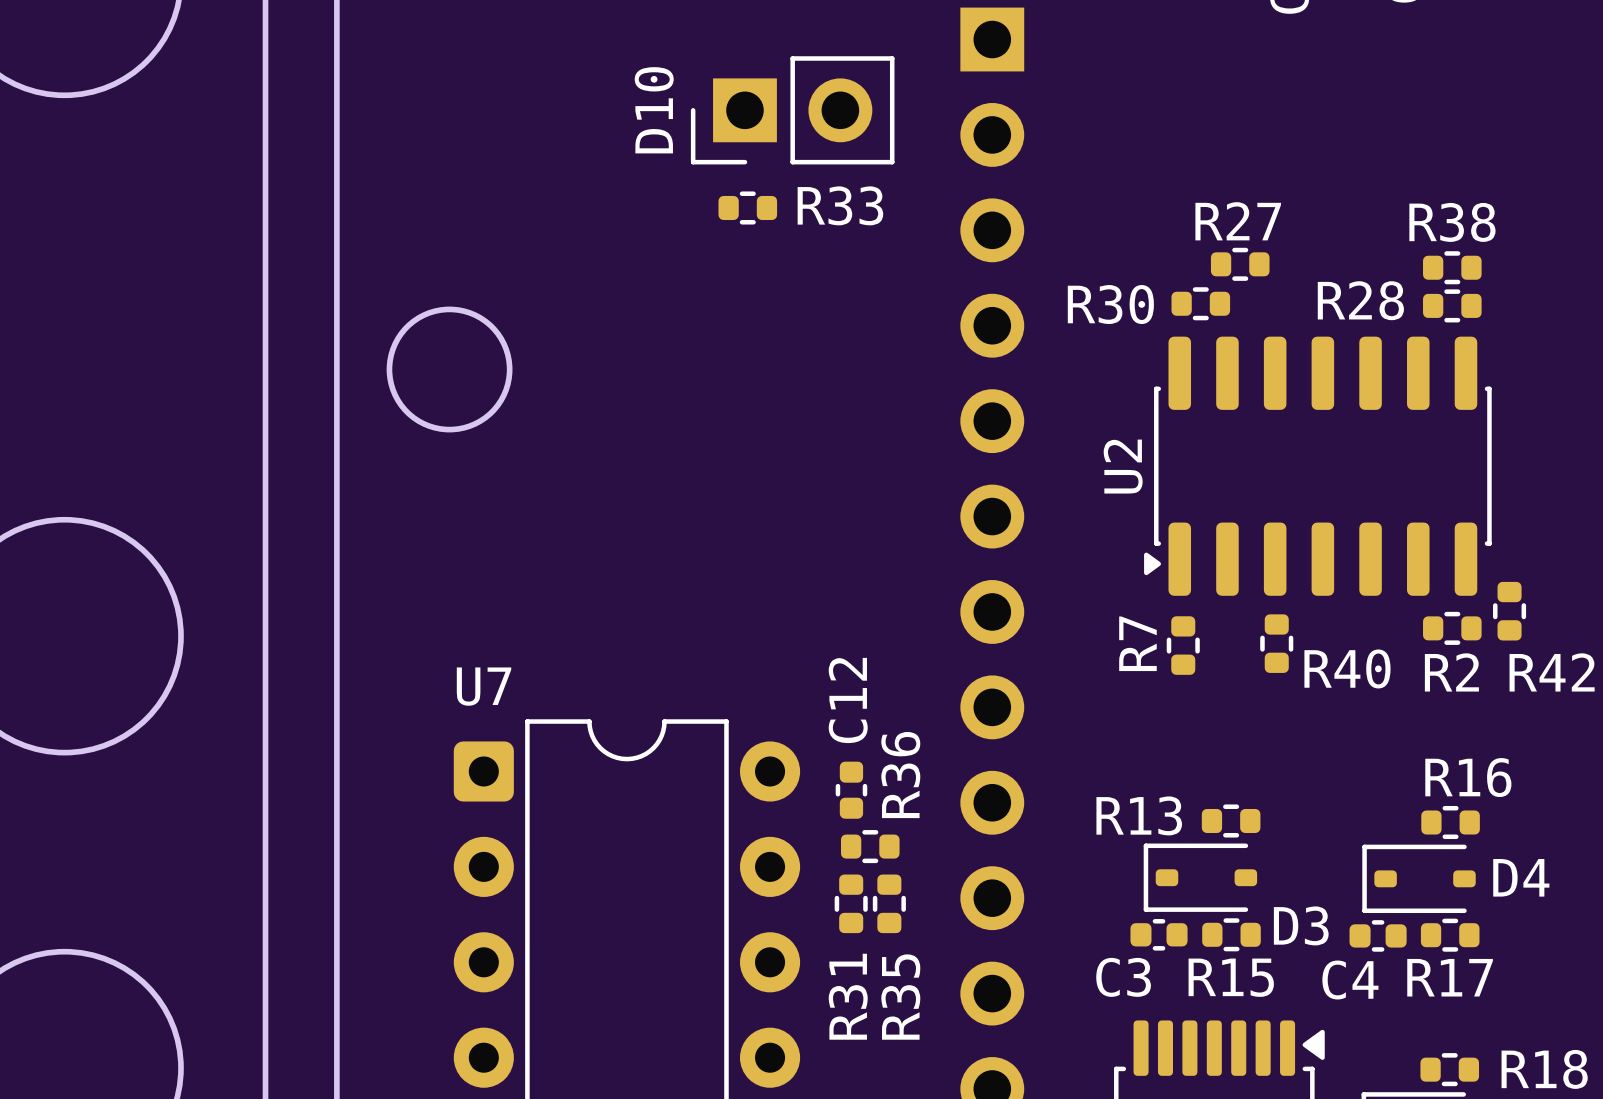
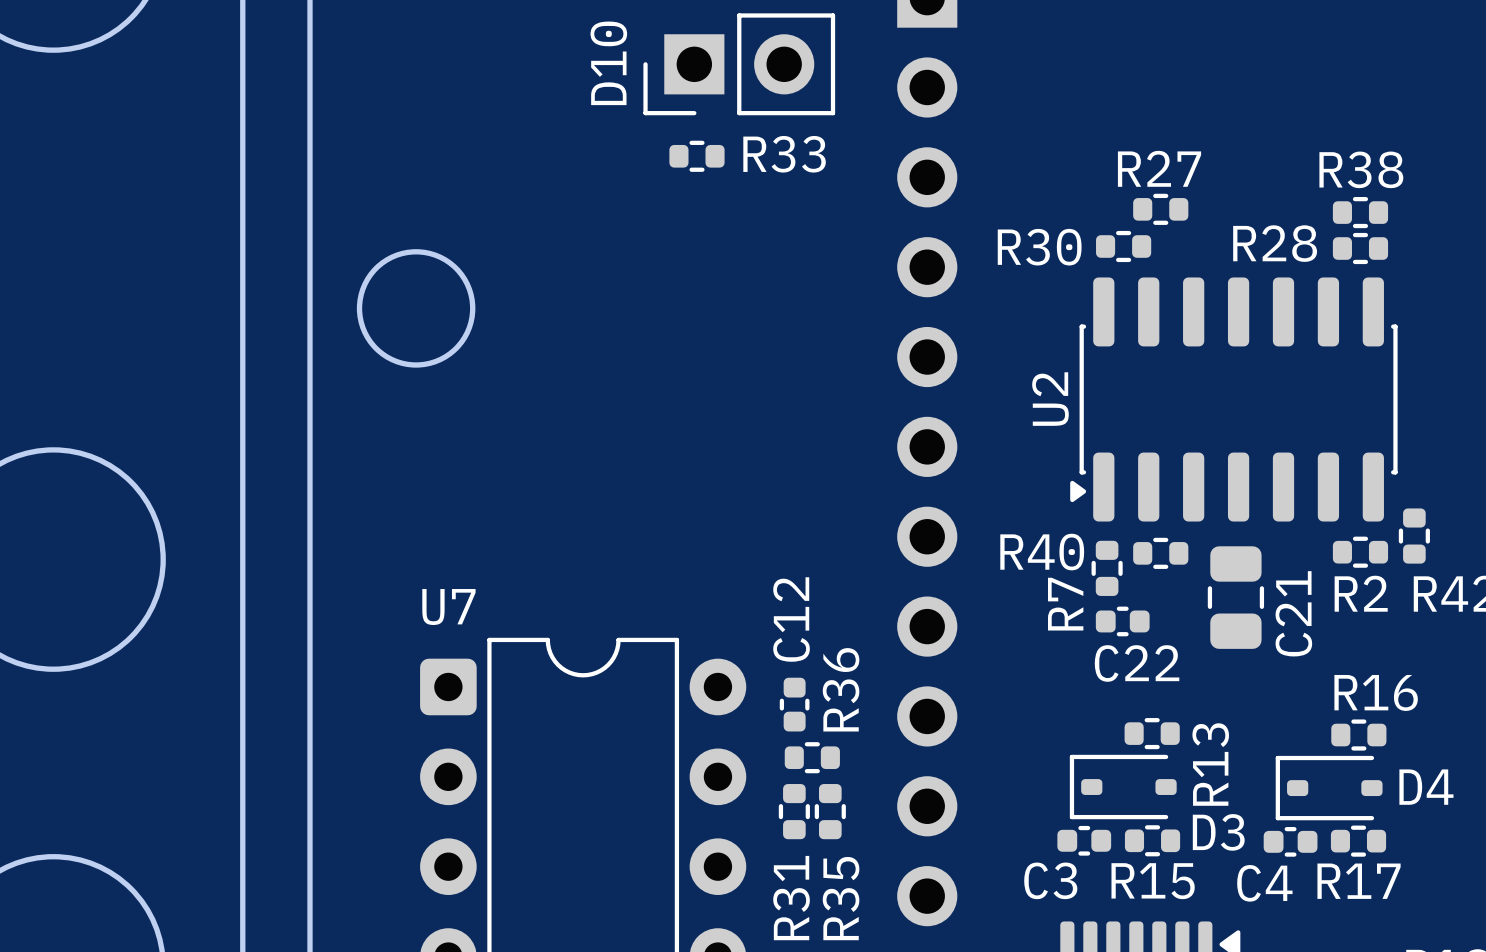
R7 name position: R7 (1137, 643) -> R7 (1065, 604)
R40 rotation: 0° (1276, 643) -> 90° clockwise (1160, 553)
R40 position: (1276, 643) -> (1160, 553)
R40 name position: R40 (1347, 668) -> R40 (1042, 552)
C21: none -> (1235, 597)
C22: none -> (1122, 621)
R13 name rotation: 0° (1139, 815) -> 90° counterclockwise (1210, 764)
R13 name position: R13 (1139, 815) -> R13 (1210, 764)

